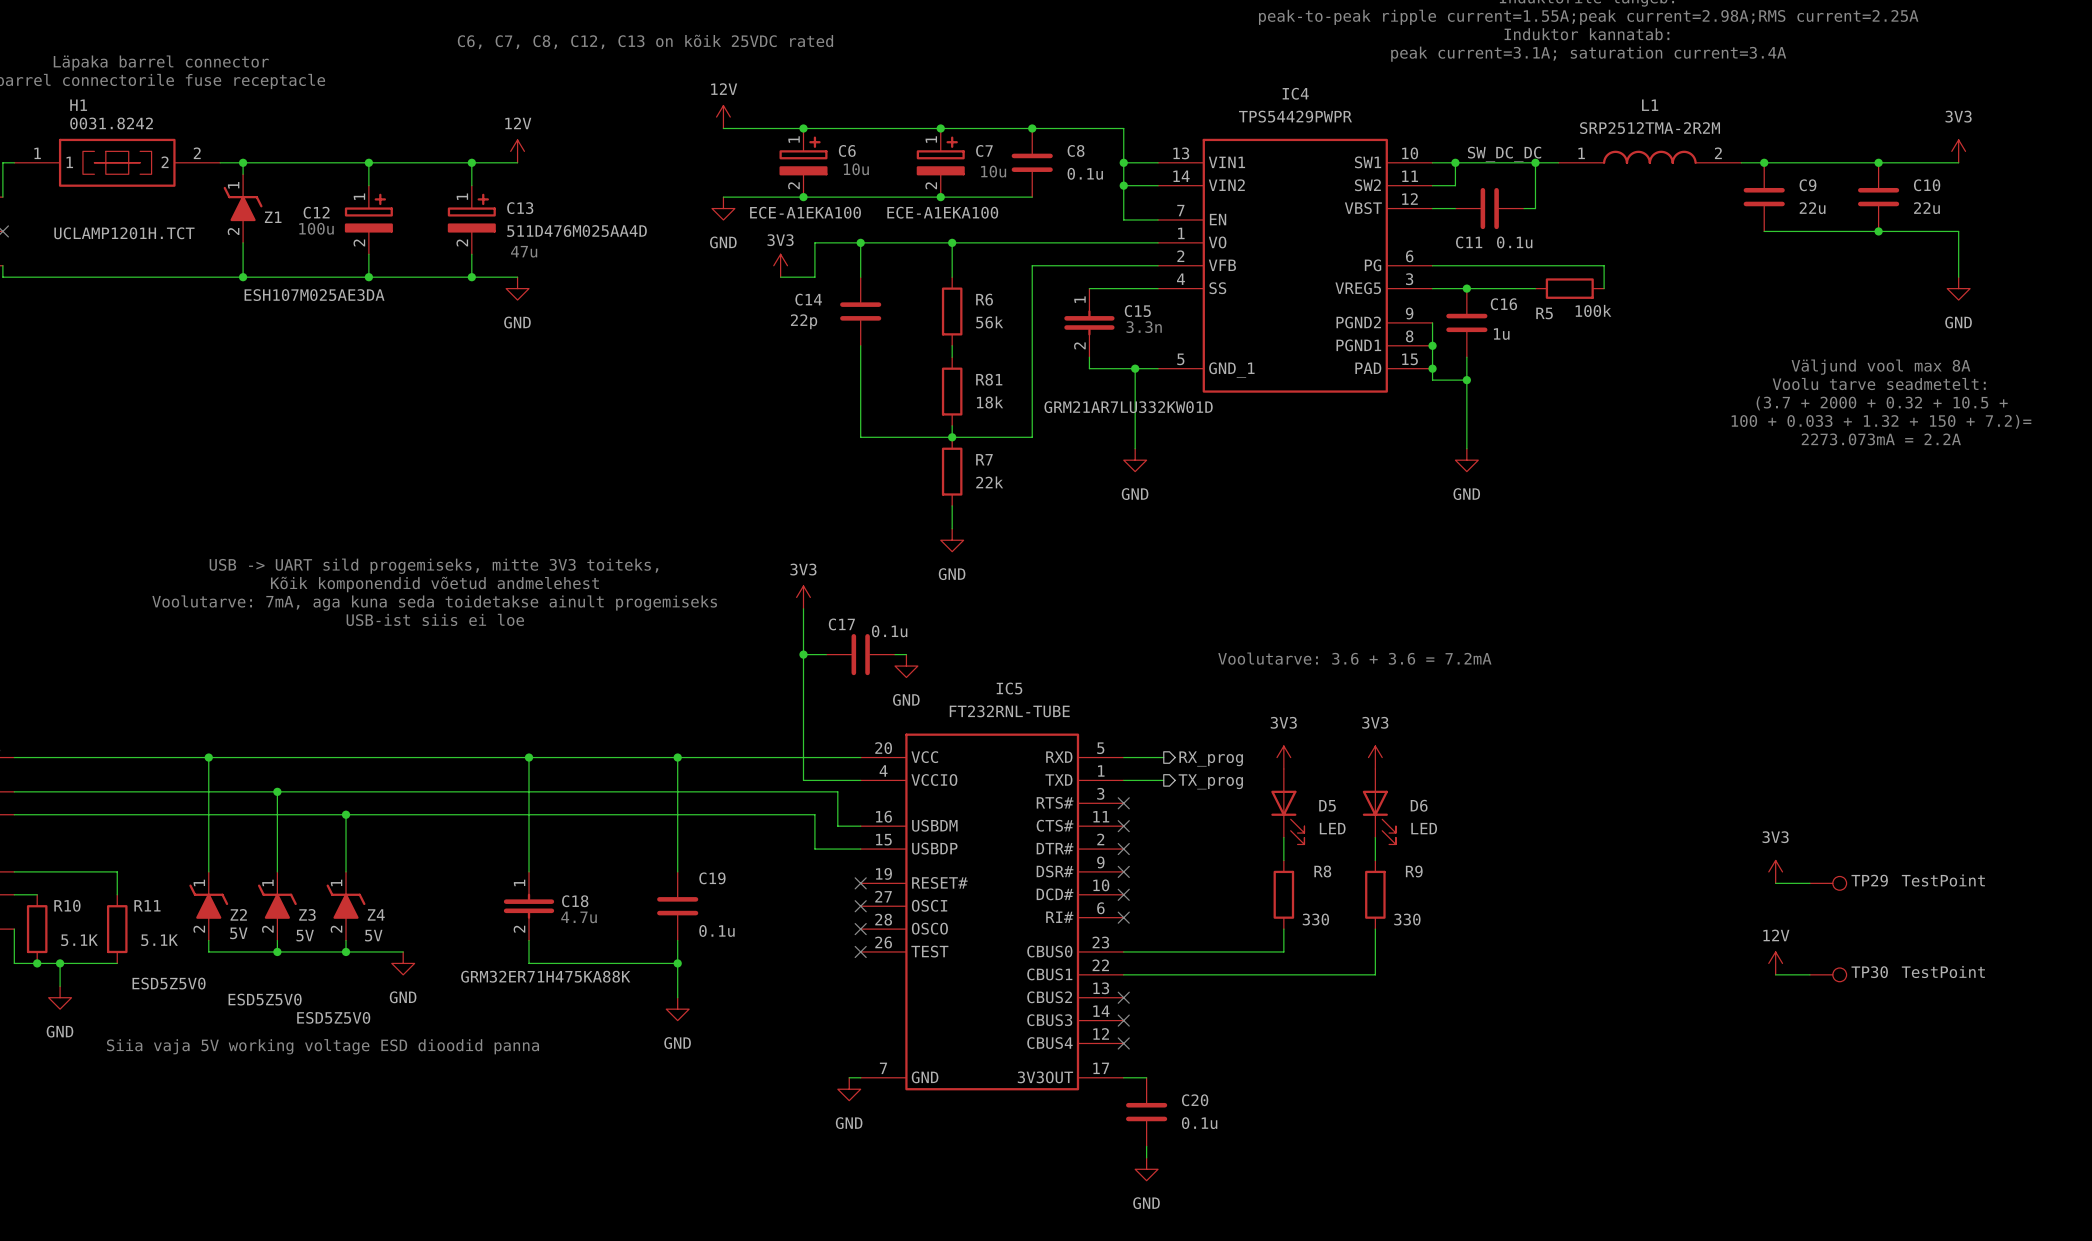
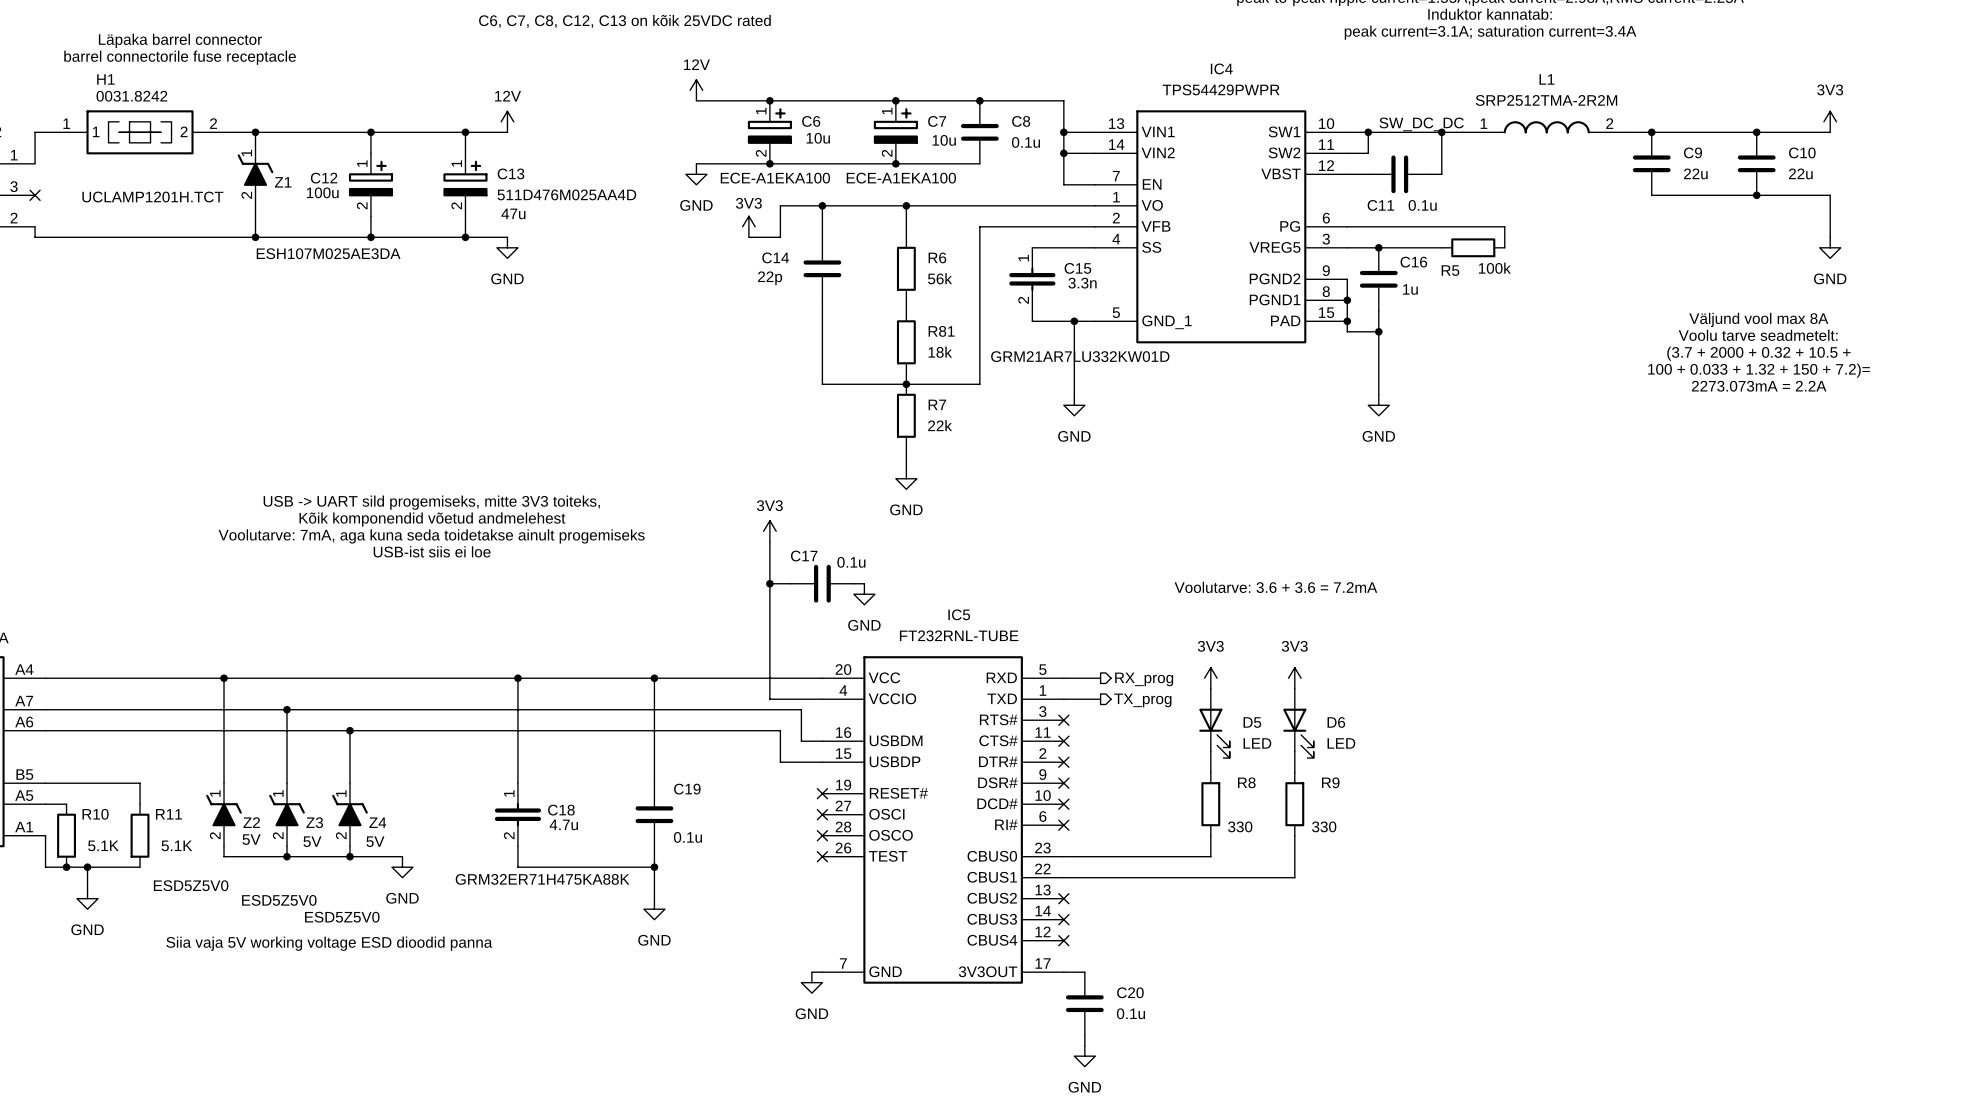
power symbol: 3V3 (1775, 871) -> none
wire: (1775, 883) (1809, 883) -> none
TP29: TestPoint (1828, 883) -> none
power symbol: 12V (1775, 963) -> none
wire: (1775, 974) (1809, 974) -> none
TP30: TestPoint (1828, 974) -> none

